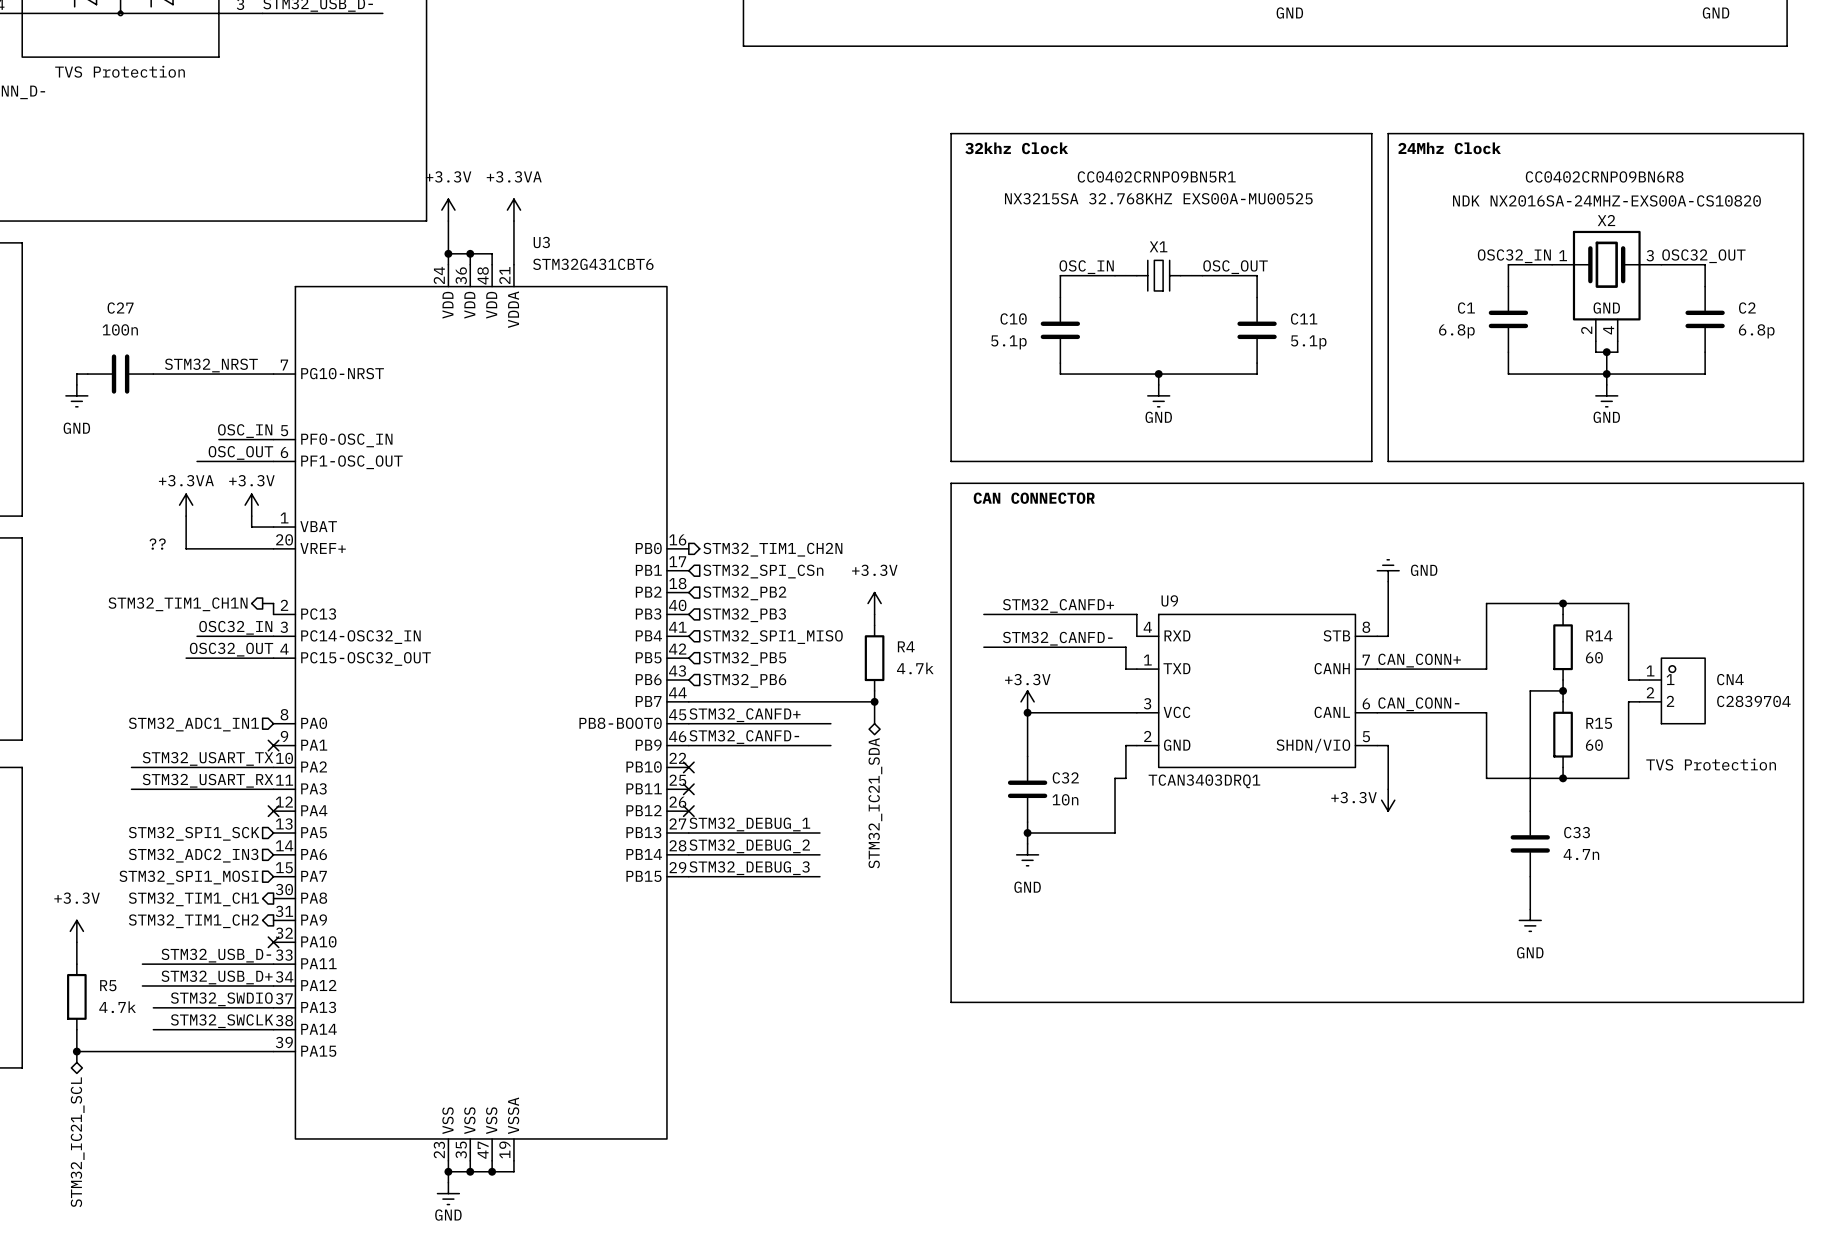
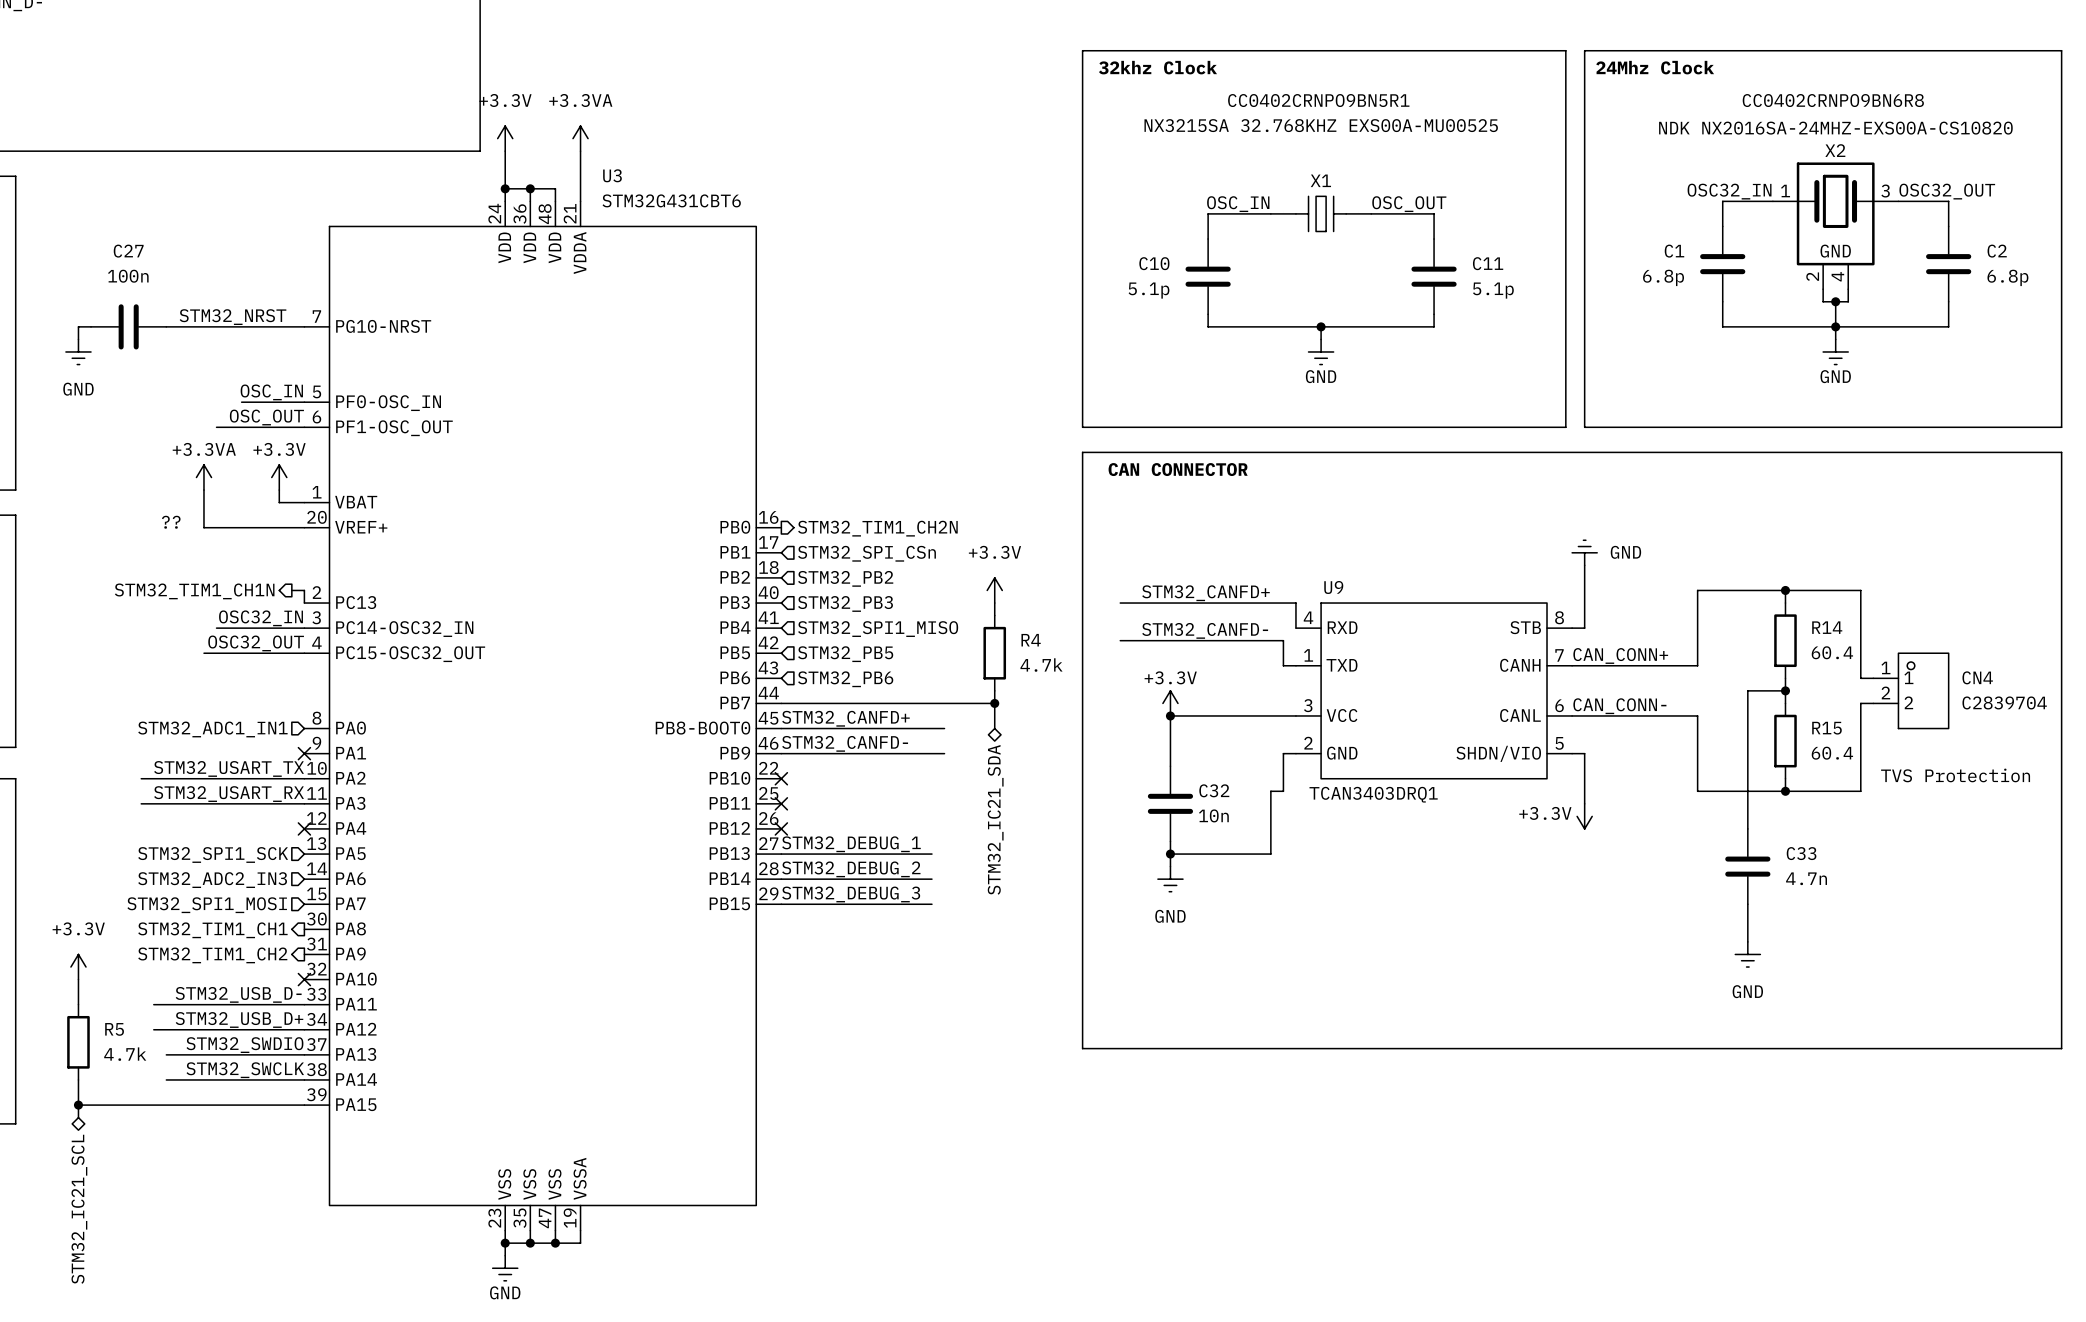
R14 value: 60 (1594, 657) -> 60.4 (1832, 652)
R15 value: 60 (1594, 745) -> 60.4 (1832, 753)

